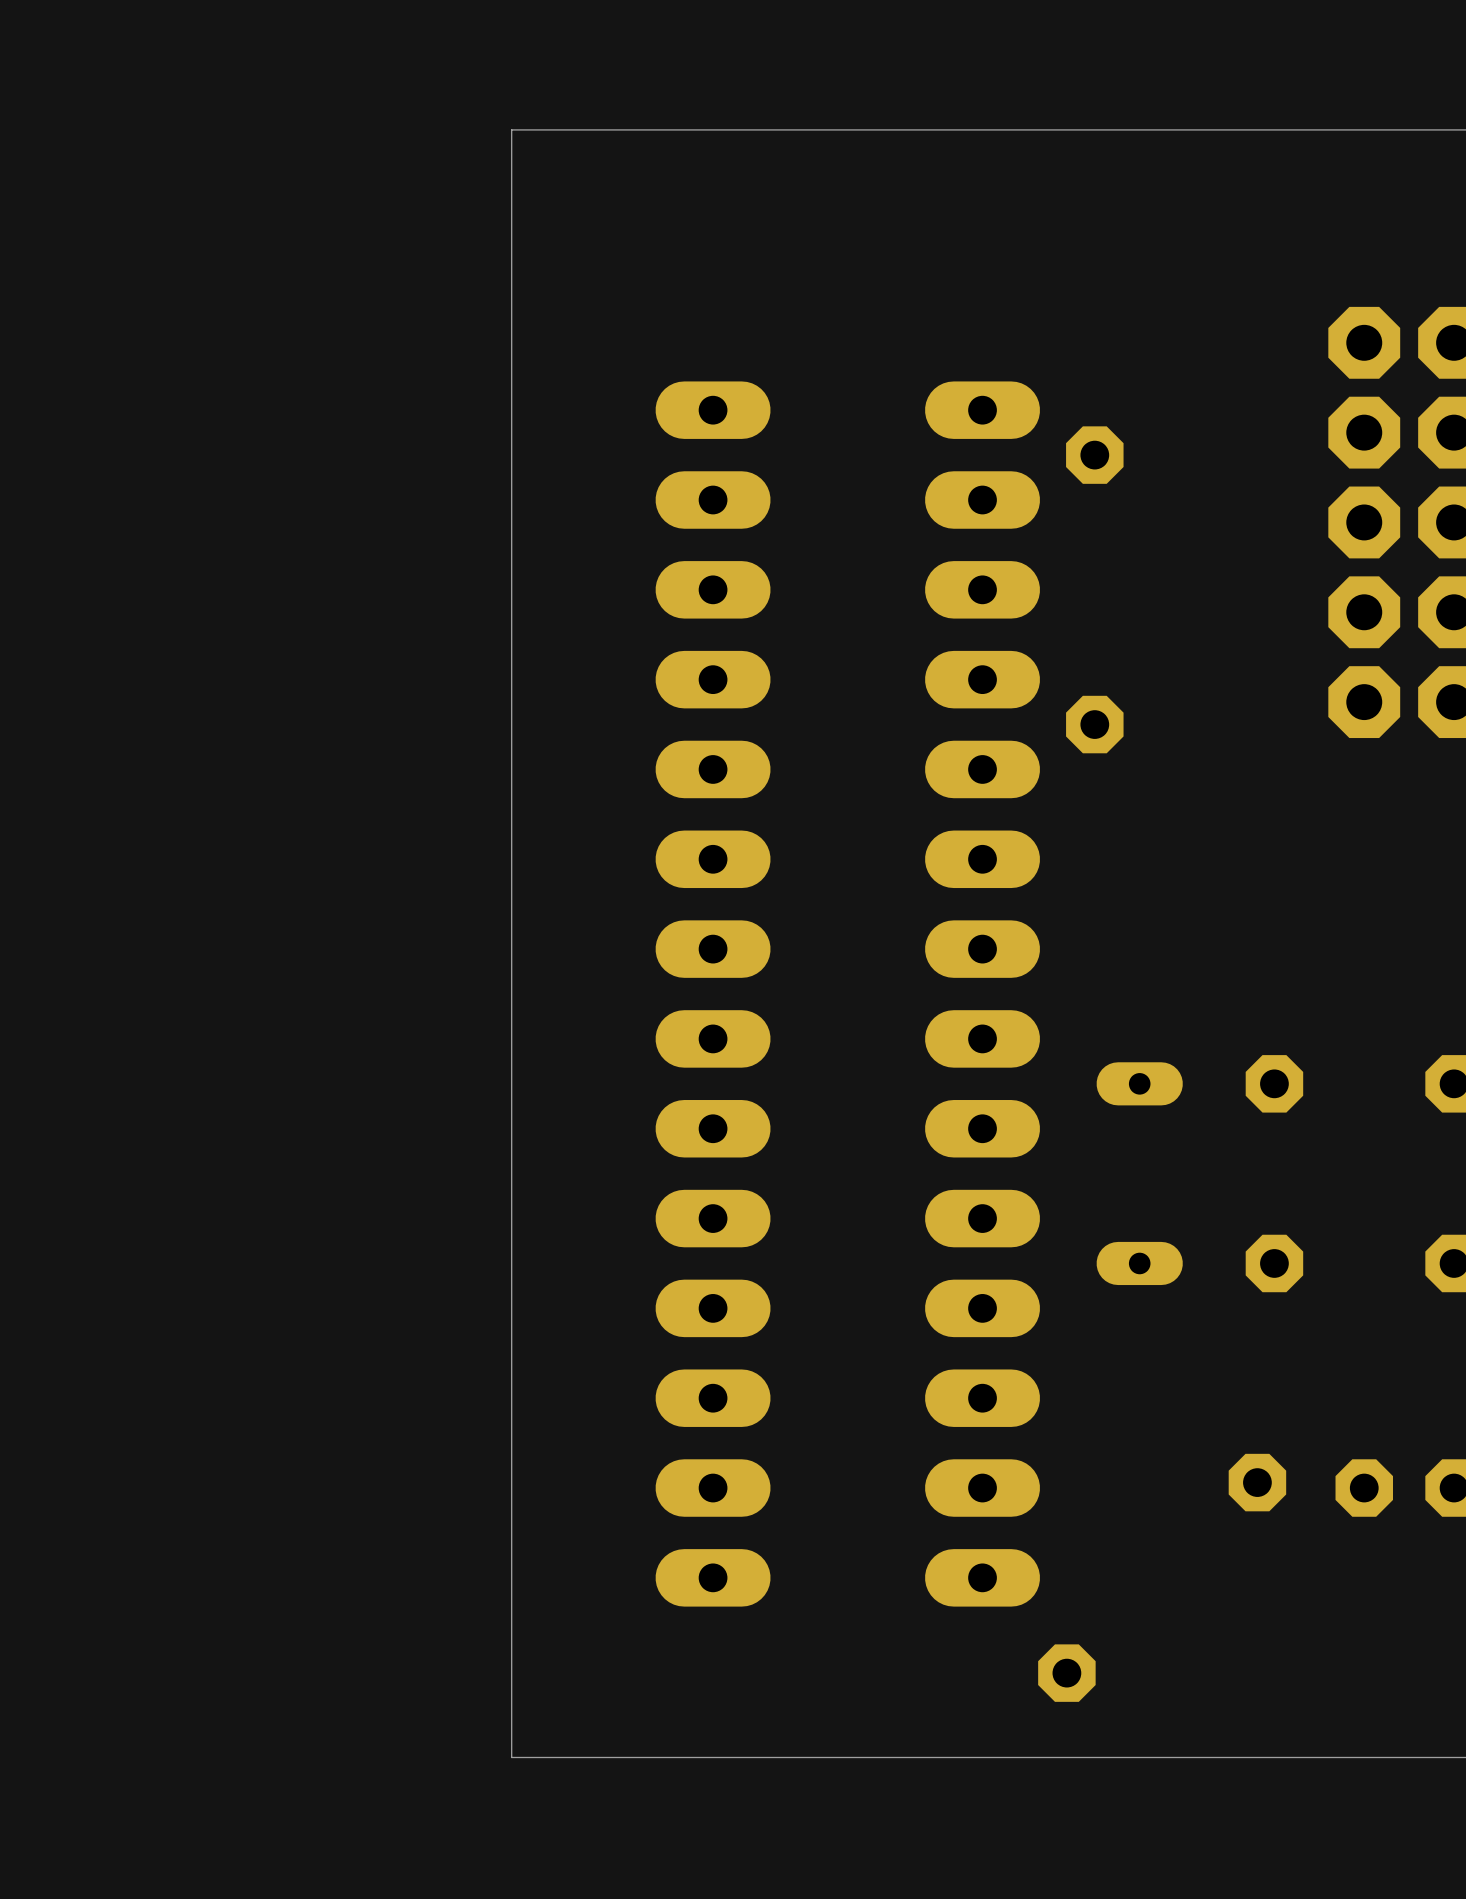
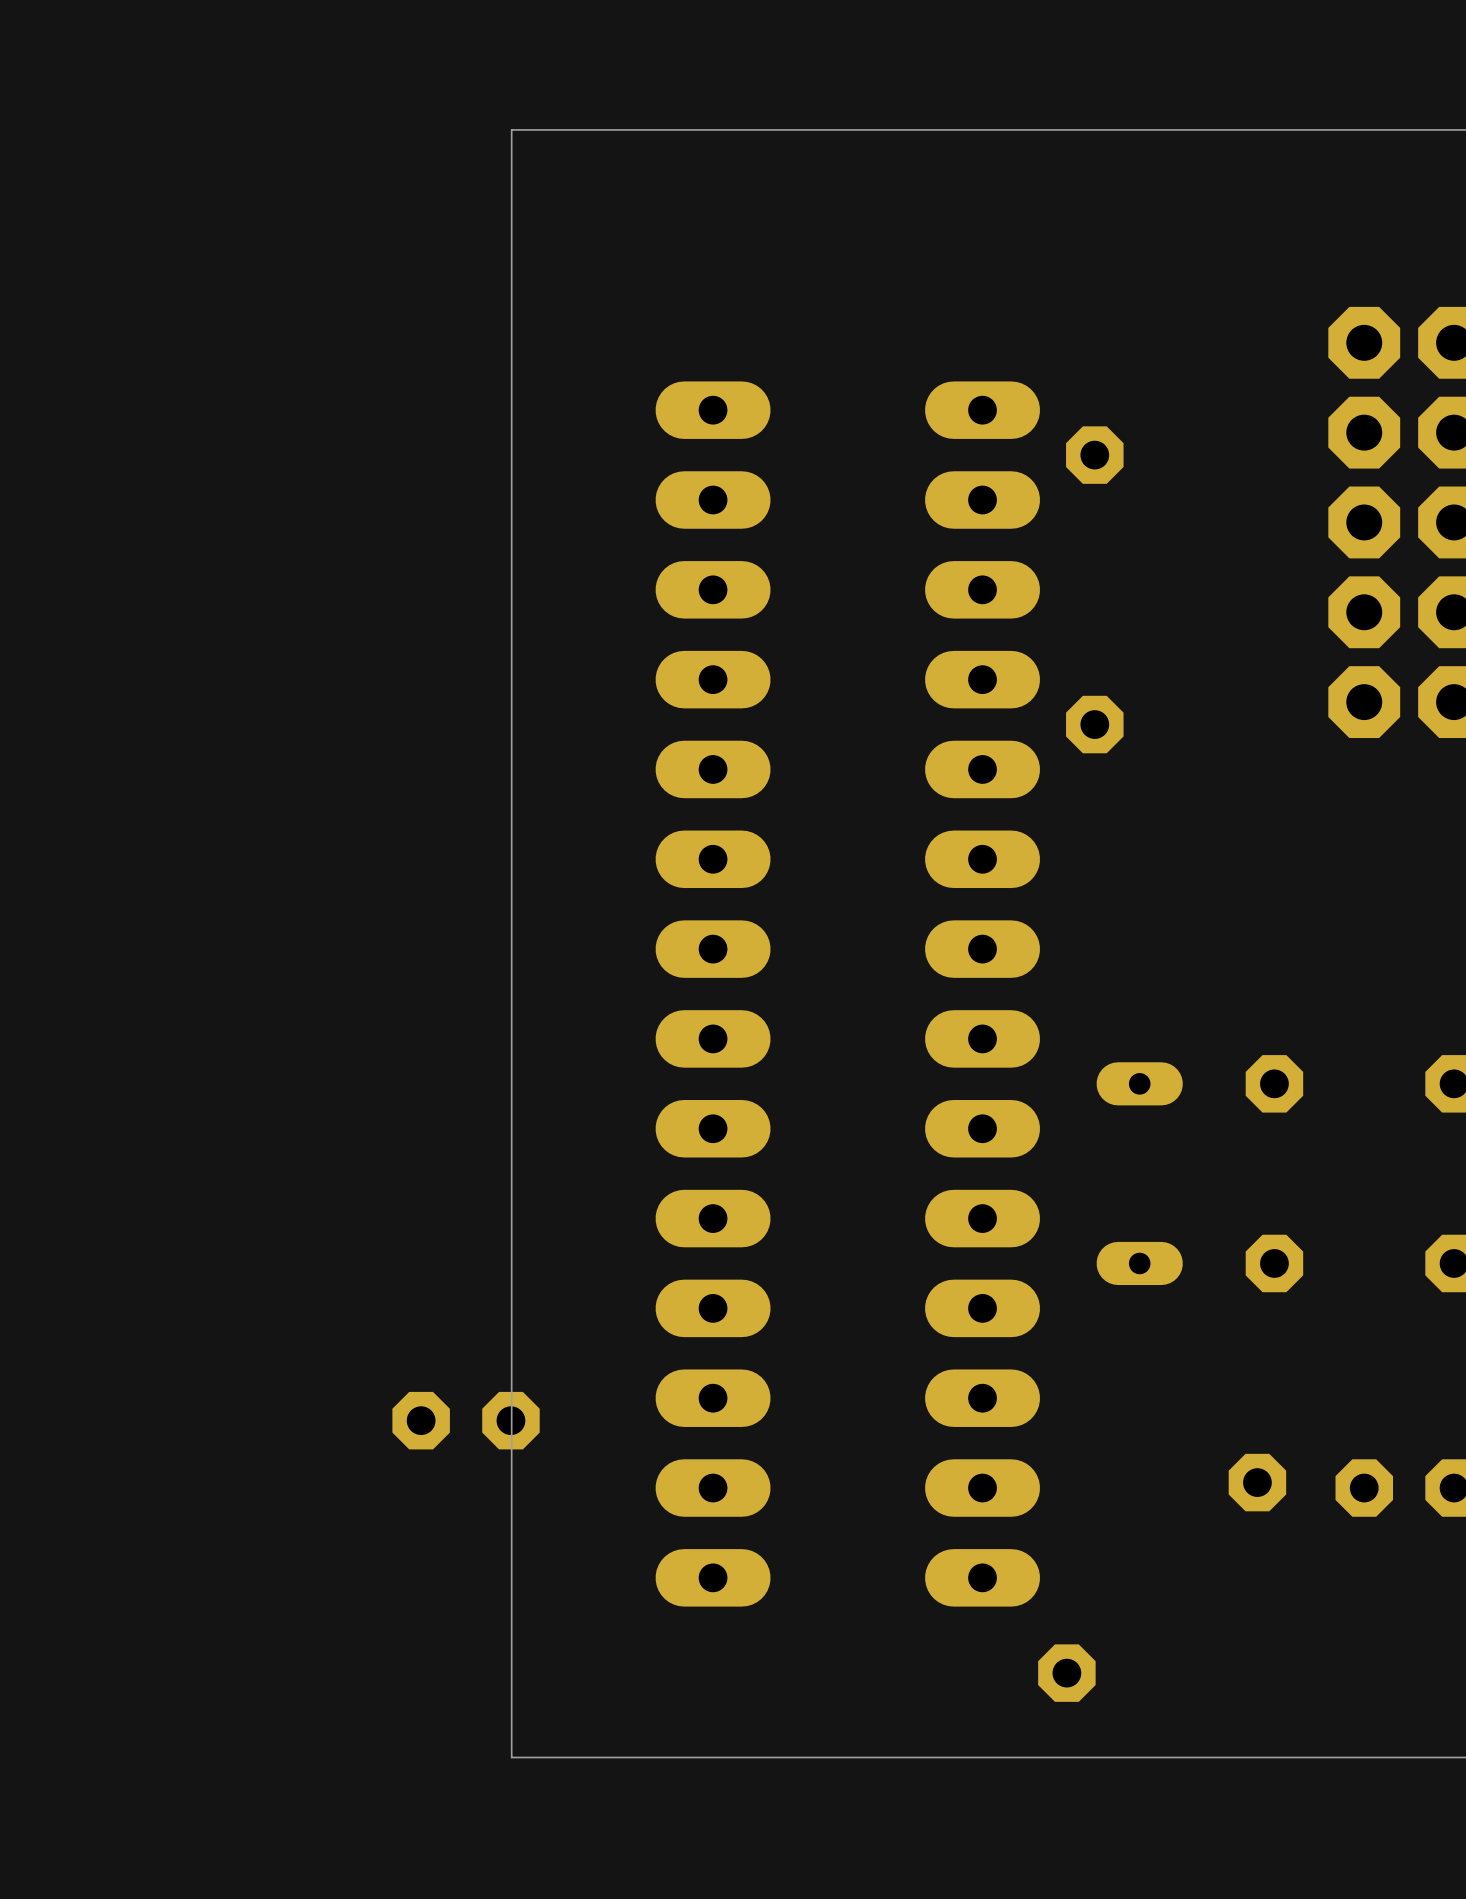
part: none -> (466, 1420)

